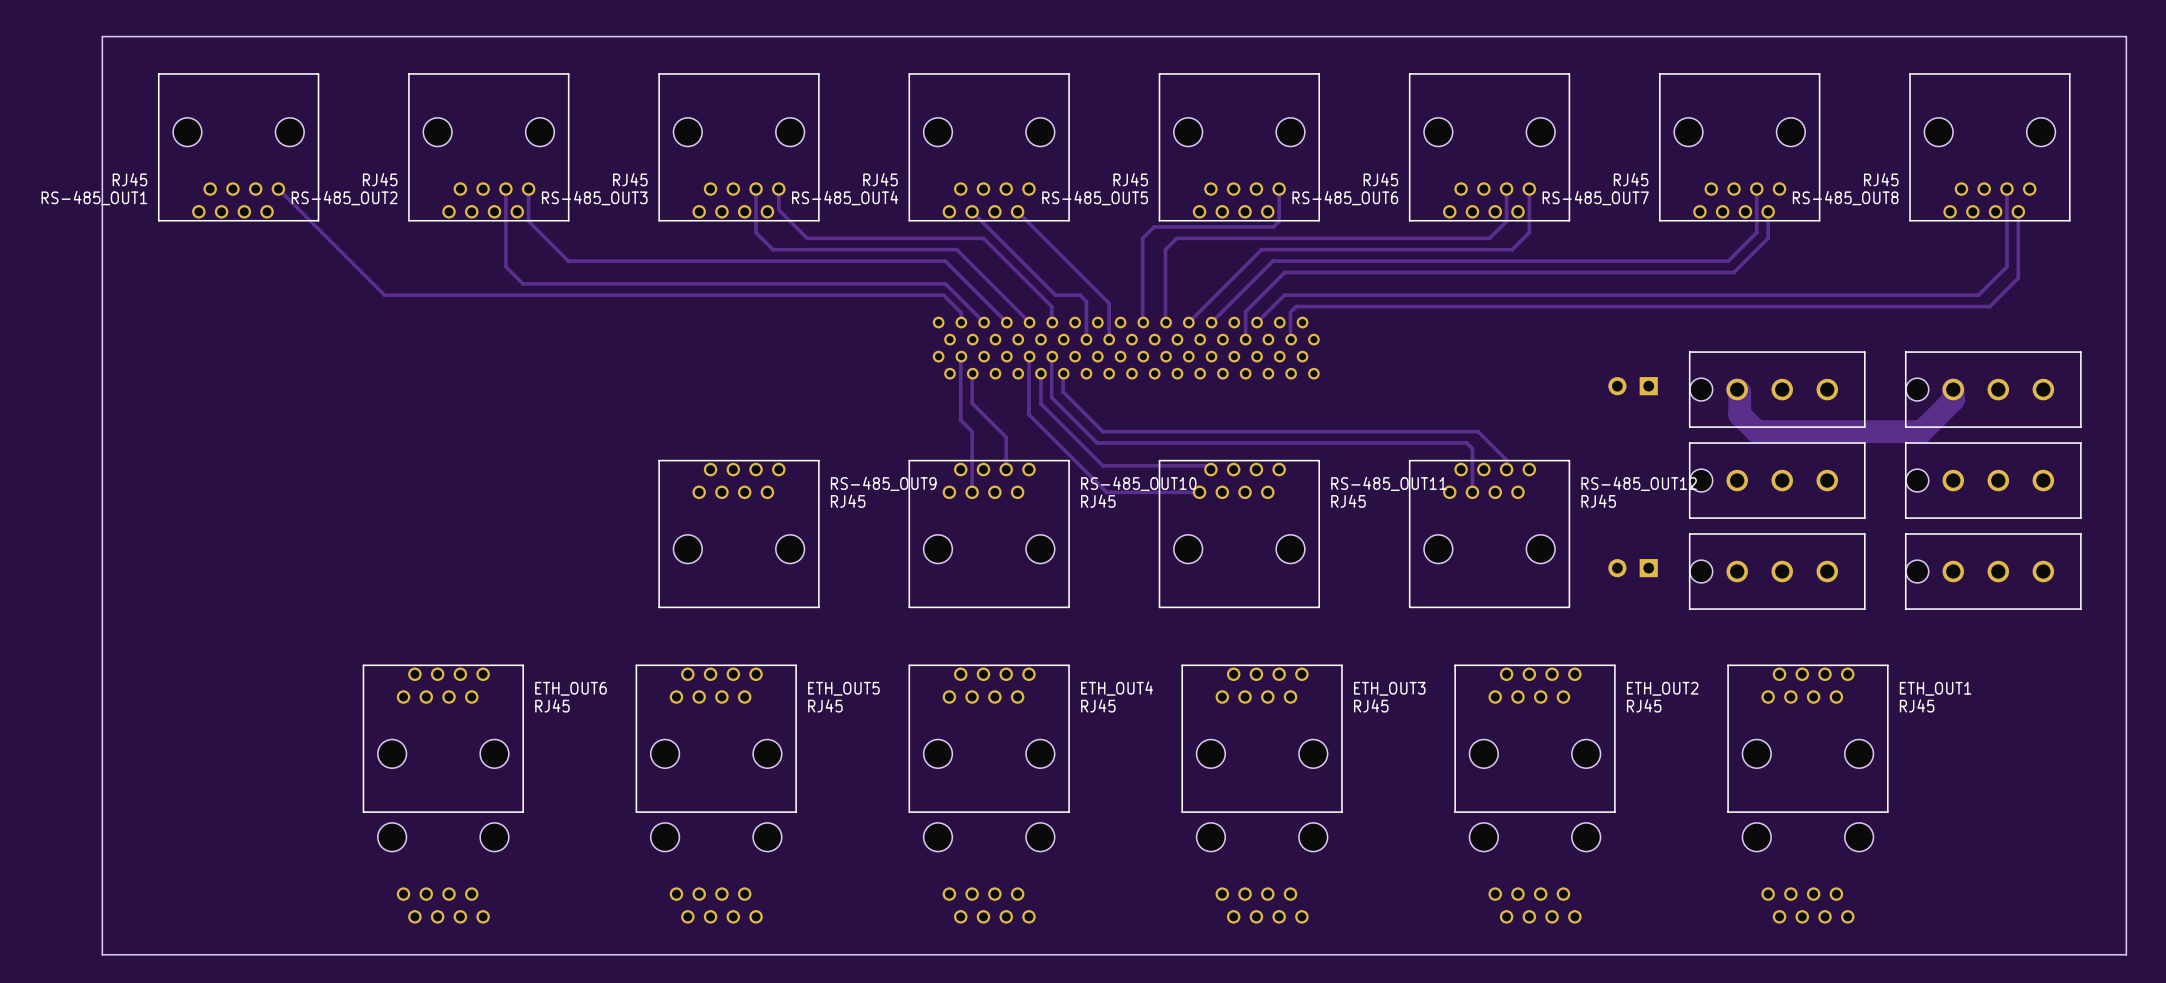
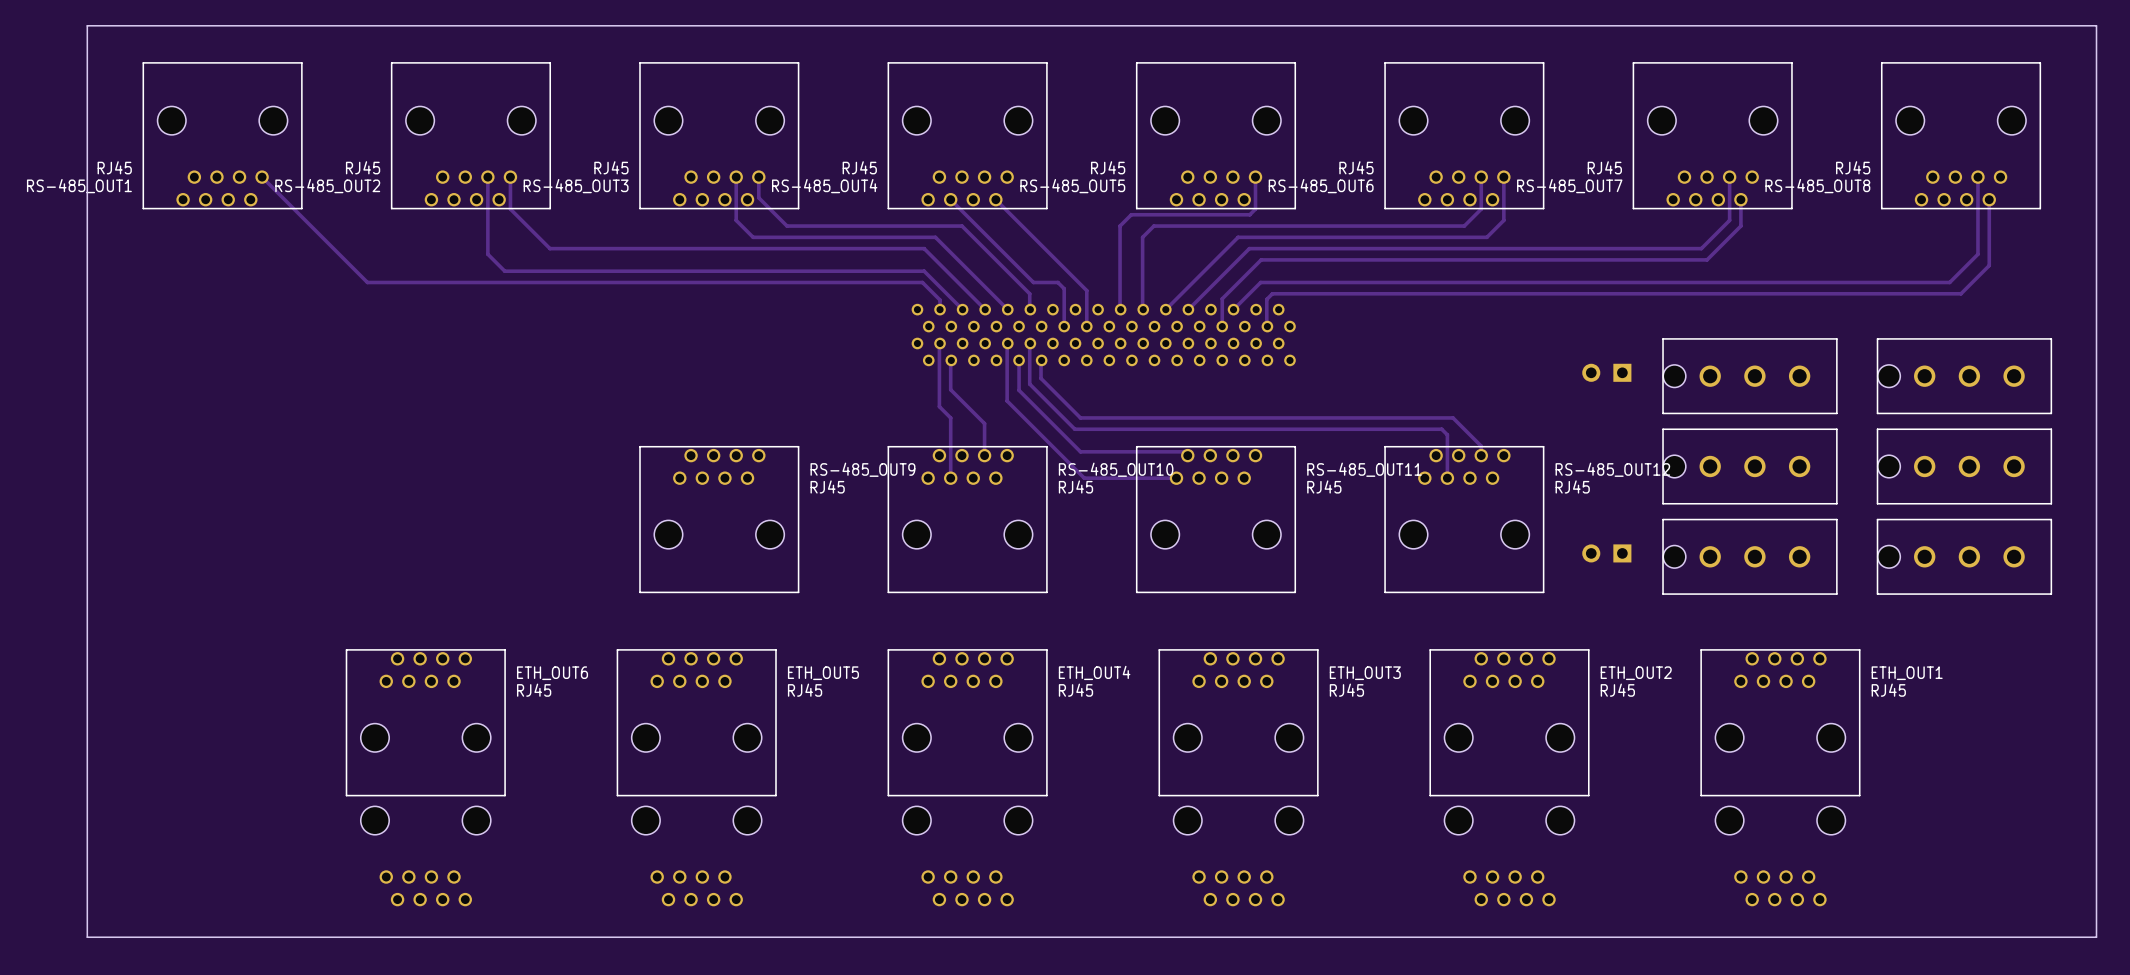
track: (1953, 389) (1953, 400) (1921, 431) (1756, 431) (1739, 414) (1739, 392) (1737, 389) -> none

